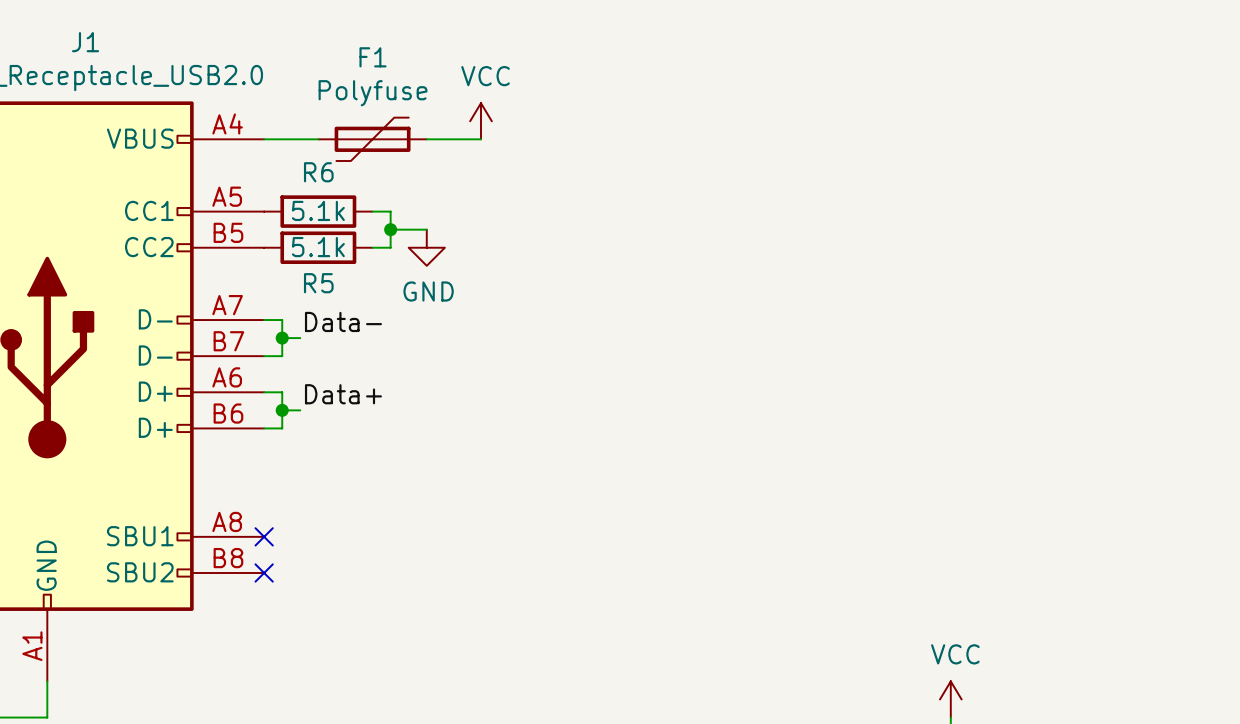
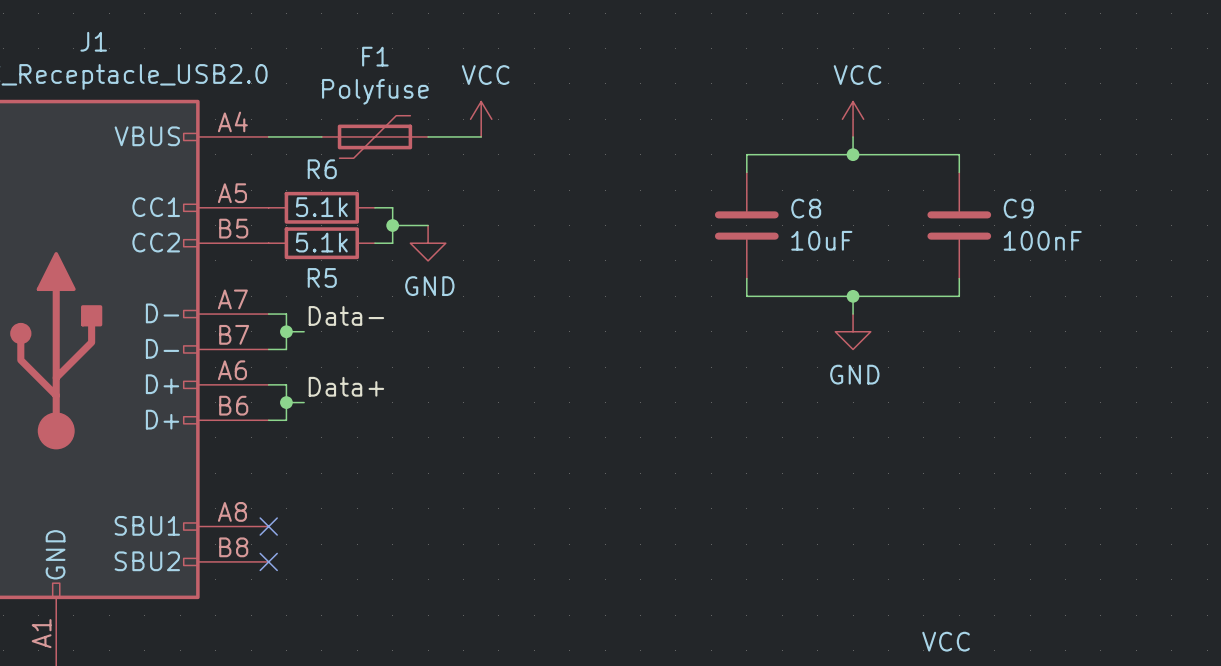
power symbol: none -> VCC (853, 119)
wire: none -> (853, 136) (853, 154)
junction: none -> (853, 154)
wire: none -> (746, 172) (746, 154) (959, 154) (959, 172)
C8: none -> 10uF (746, 225)
C9: none -> 100nF (959, 225)
wire: none -> (746, 278) (746, 296) (959, 296) (959, 278)
wire: none -> (853, 296) (853, 314)
junction: none -> (853, 296)
power symbol: none -> GND (853, 331)

